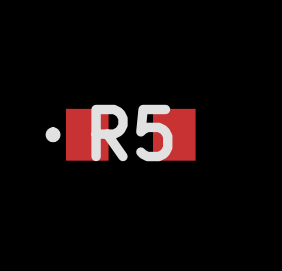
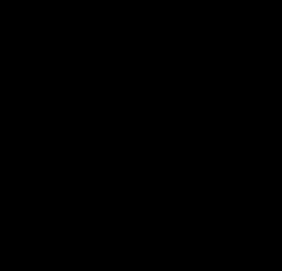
R5: (120, 134) -> none

